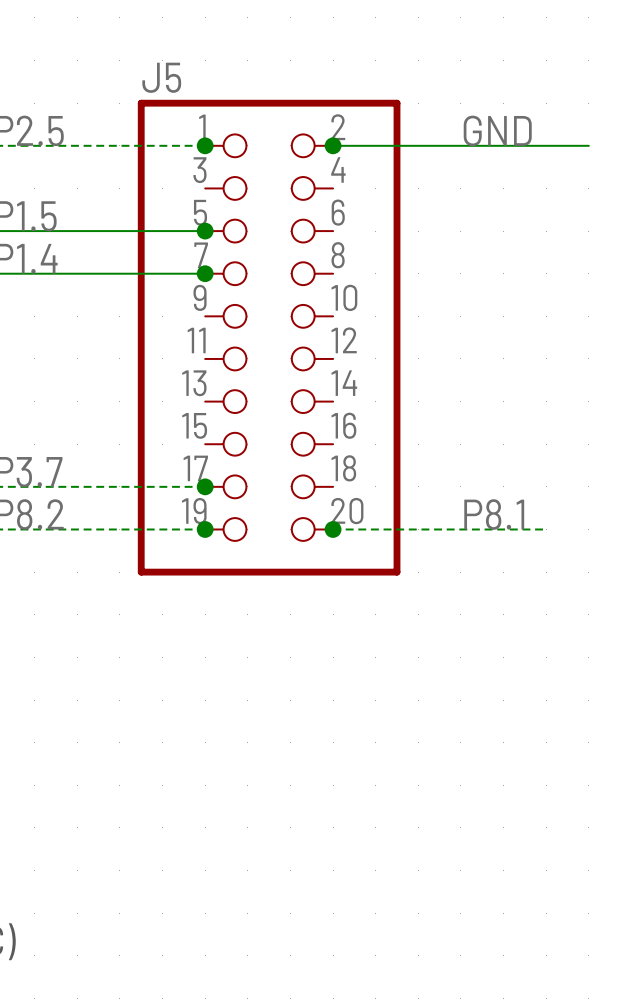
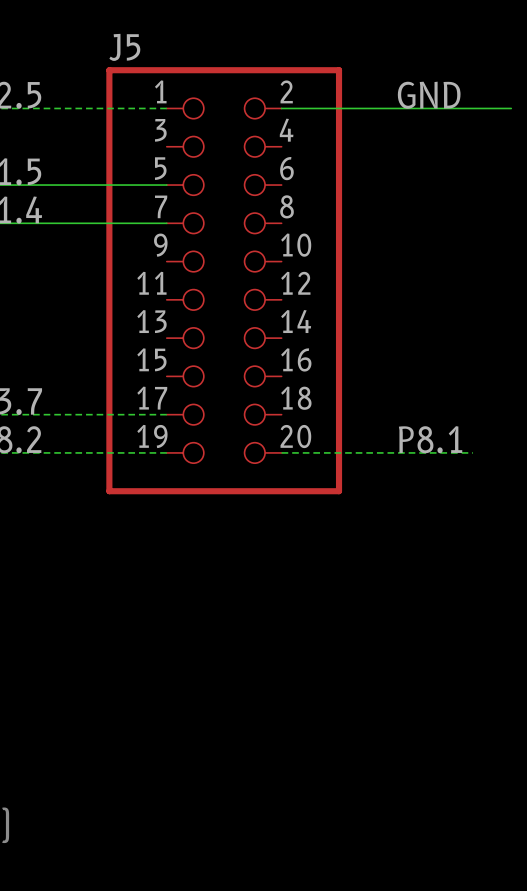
junction: (205, 145) -> none
junction: (333, 145) -> none
junction: (205, 231) -> none
junction: (205, 273) -> none
junction: (205, 486) -> none
junction: (205, 529) -> none
junction: (333, 529) -> none

